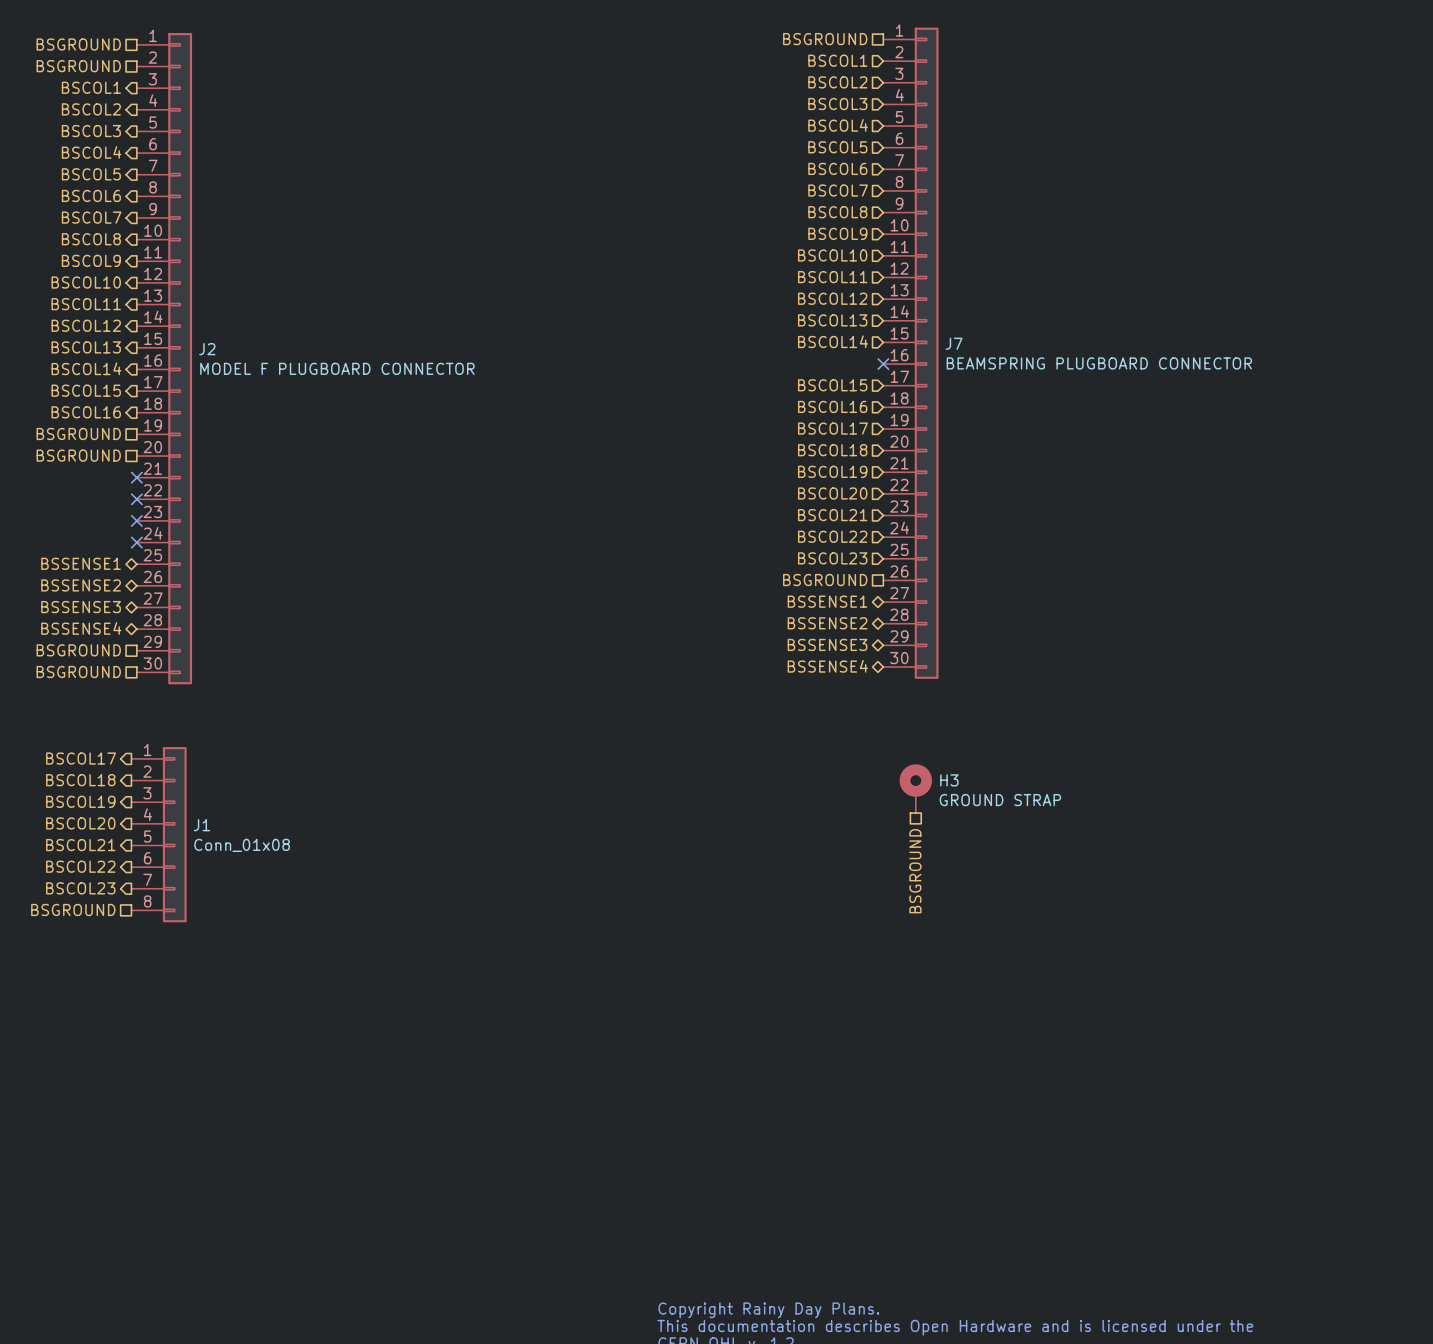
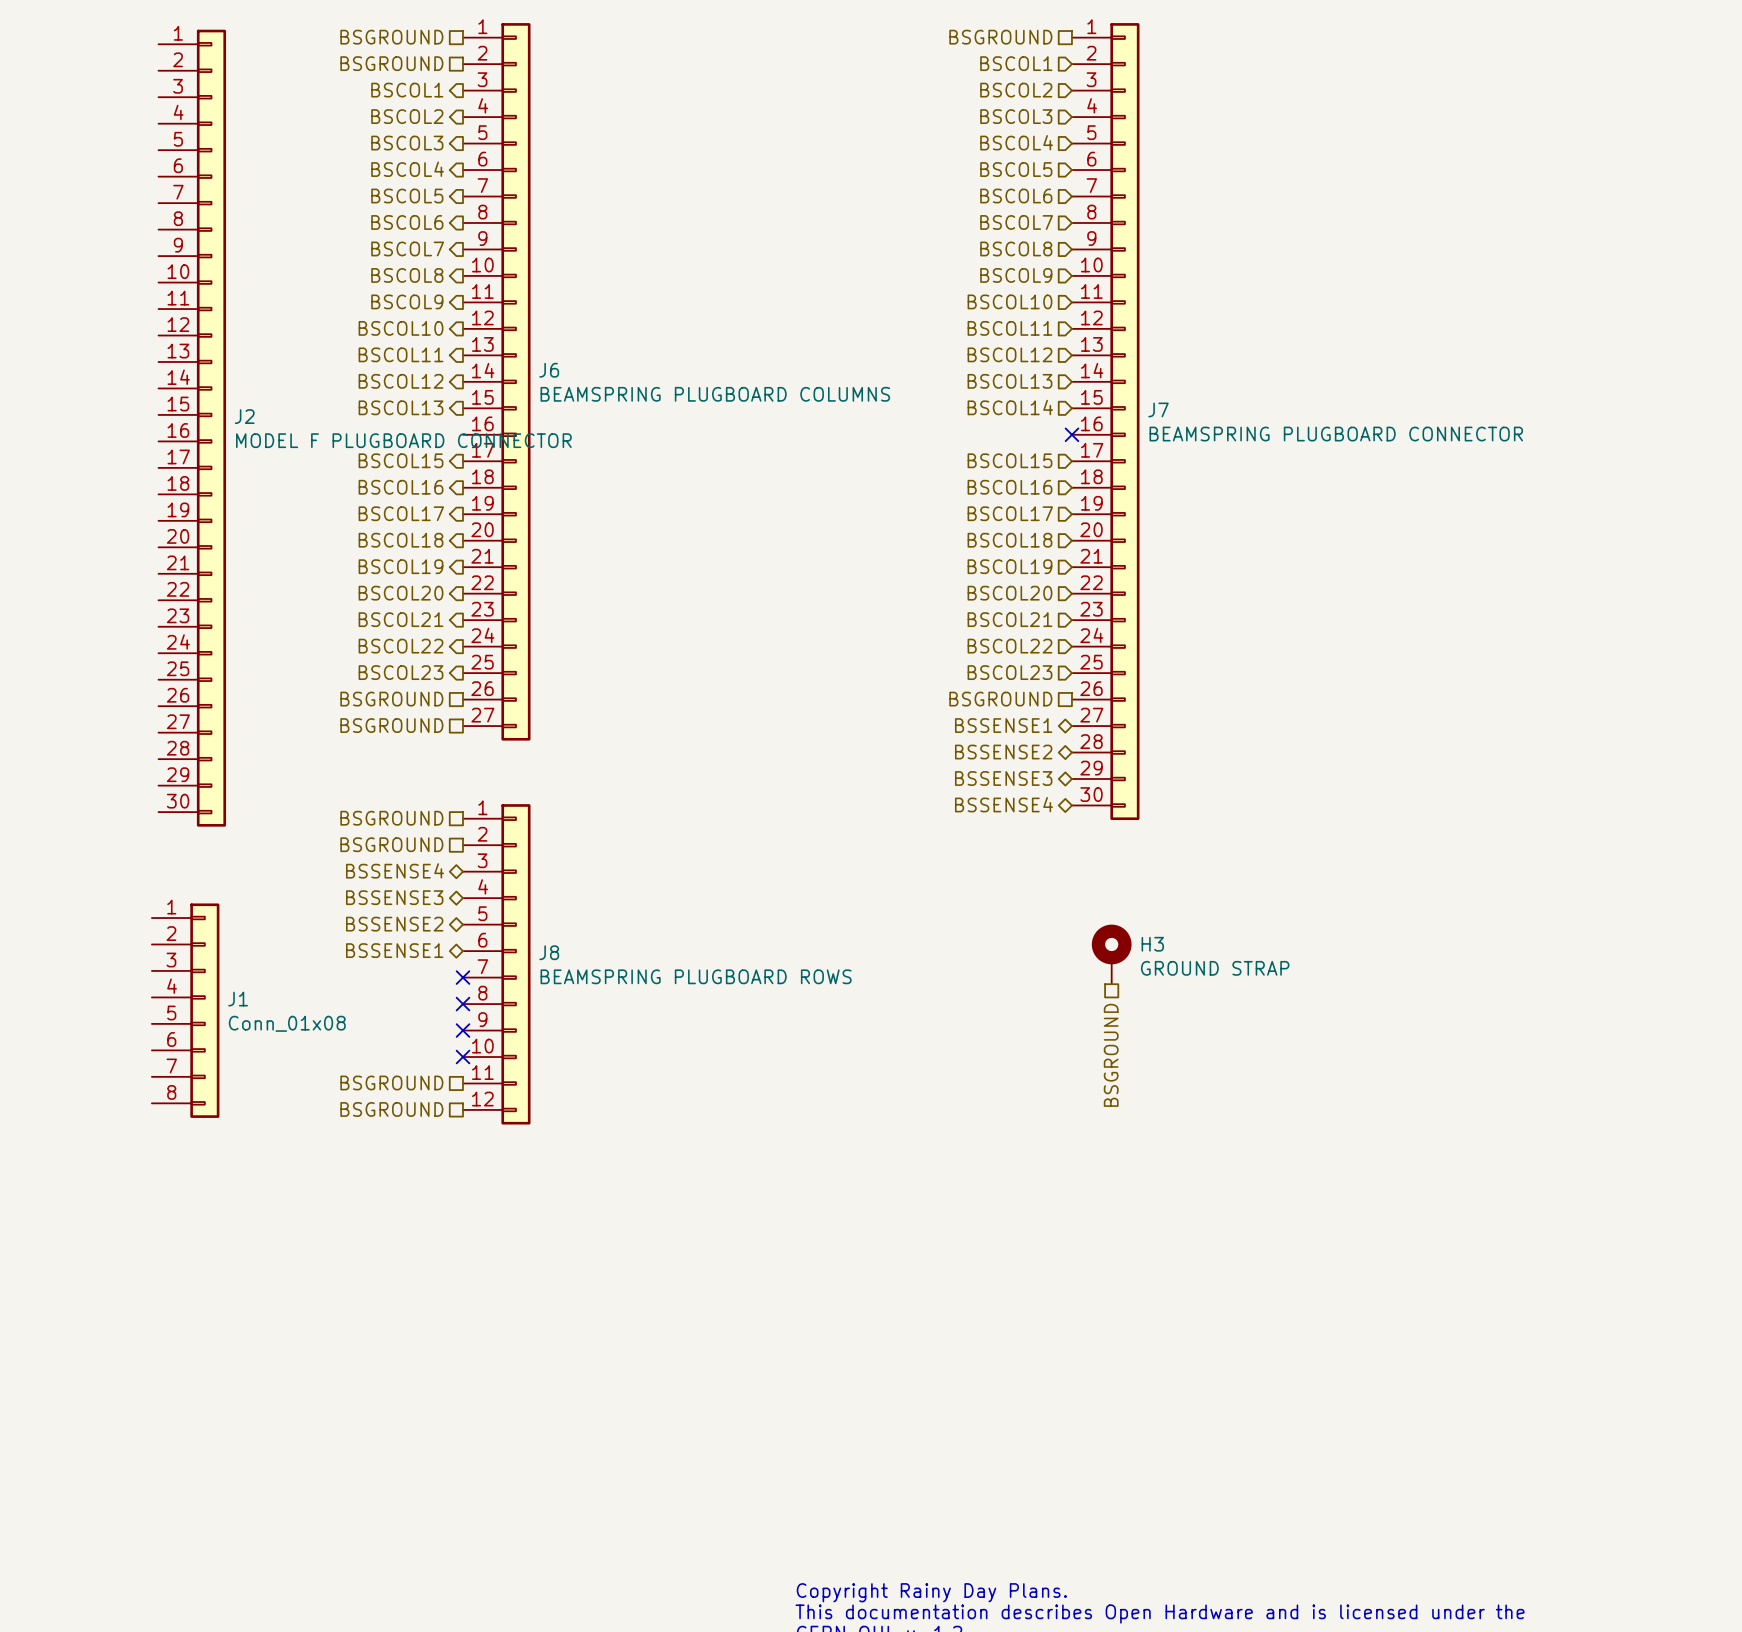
hierarchical label: none -> BSGROUND (391, 37)
hierarchical label: BSGROUND (78, 44) -> none
hierarchical label: none -> BSGROUND (391, 63)
hierarchical label: BSGROUND (78, 66) -> none
hierarchical label: none -> BSCOL1 (407, 90)
hierarchical label: BSCOL1 (91, 87) -> none
hierarchical label: none -> BSCOL2 (407, 116)
hierarchical label: BSCOL2 (91, 109) -> none
hierarchical label: none -> BSCOL3 (407, 143)
hierarchical label: BSCOL3 (91, 131) -> none
hierarchical label: none -> BSCOL4 (407, 169)
hierarchical label: BSCOL4 (91, 152) -> none
hierarchical label: none -> BSCOL5 (407, 196)
hierarchical label: BSCOL5 (91, 174) -> none
hierarchical label: none -> BSCOL6 (407, 222)
hierarchical label: BSCOL6 (91, 195) -> none
hierarchical label: none -> BSCOL7 (407, 248)
hierarchical label: BSCOL7 (91, 217) -> none
hierarchical label: none -> BSCOL8 (407, 275)
hierarchical label: BSCOL8 (91, 239) -> none
hierarchical label: none -> BSCOL9 (407, 301)
hierarchical label: BSCOL9 (91, 260) -> none
hierarchical label: none -> BSCOL10 (401, 328)
hierarchical label: BSCOL10 (86, 282) -> none
hierarchical label: none -> BSCOL11 (401, 354)
hierarchical label: BSCOL11 (86, 304) -> none
hierarchical label: none -> BSCOL12 (401, 381)
J6: none -> BEAMSPRING PLUGBOARD COLUMNS (496, 381)
hierarchical label: BSCOL12 (86, 325) -> none
hierarchical label: none -> BSCOL13 (401, 407)
hierarchical label: BSCOL13 (86, 347) -> none
hierarchical label: BSCOL14 (86, 368) -> none
hierarchical label: none -> BSCOL15 (401, 460)
hierarchical label: BSCOL15 (86, 390) -> none
hierarchical label: none -> BSCOL16 (401, 487)
hierarchical label: BSCOL16 (86, 412) -> none
hierarchical label: none -> BSCOL17 (401, 513)
hierarchical label: BSGROUND (78, 433) -> none
hierarchical label: none -> BSCOL18 (401, 540)
hierarchical label: BSGROUND (78, 455) -> none
hierarchical label: none -> BSCOL19 (401, 566)
no-connect mark: (136, 477) -> none
hierarchical label: none -> BSCOL20 (401, 593)
no-connect mark: (136, 499) -> none
hierarchical label: none -> BSCOL21 (401, 619)
no-connect mark: (136, 520) -> none
hierarchical label: none -> BSCOL22 (401, 646)
no-connect mark: (136, 542) -> none
hierarchical label: none -> BSCOL23 (401, 672)
hierarchical label: BSSENSE1 (81, 563) -> none
hierarchical label: none -> BSGROUND (391, 699)
hierarchical label: BSSENSE2 (81, 585) -> none
hierarchical label: none -> BSGROUND (391, 725)
hierarchical label: BSSENSE3 (81, 607) -> none
hierarchical label: BSSENSE4 (81, 628) -> none
hierarchical label: BSGROUND (78, 650) -> none
hierarchical label: BSGROUND (78, 671) -> none
hierarchical label: none -> BSGROUND (391, 818)
hierarchical label: none -> BSGROUND (391, 844)
hierarchical label: none -> BSSENSE4 (395, 870)
hierarchical label: none -> BSSENSE3 (394, 897)
hierarchical label: BSCOL17 (81, 758) -> none
hierarchical label: none -> BSSENSE2 (394, 924)
hierarchical label: BSCOL18 (80, 780) -> none
hierarchical label: none -> BSSENSE1 (394, 950)
J8: none -> BEAMSPRING PLUGBOARD ROWS (496, 964)
hierarchical label: BSCOL19 (80, 801) -> none
no-connect mark: none -> (463, 977)
hierarchical label: BSCOL20 (80, 823) -> none
no-connect mark: none -> (463, 1004)
hierarchical label: BSCOL21 (80, 845) -> none
no-connect mark: none -> (463, 1030)
hierarchical label: BSCOL22 (80, 866) -> none
no-connect mark: none -> (463, 1057)
hierarchical label: BSCOL23 (80, 888) -> none
hierarchical label: none -> BSGROUND (391, 1082)
hierarchical label: BSGROUND (73, 909) -> none
hierarchical label: none -> BSGROUND (391, 1109)

